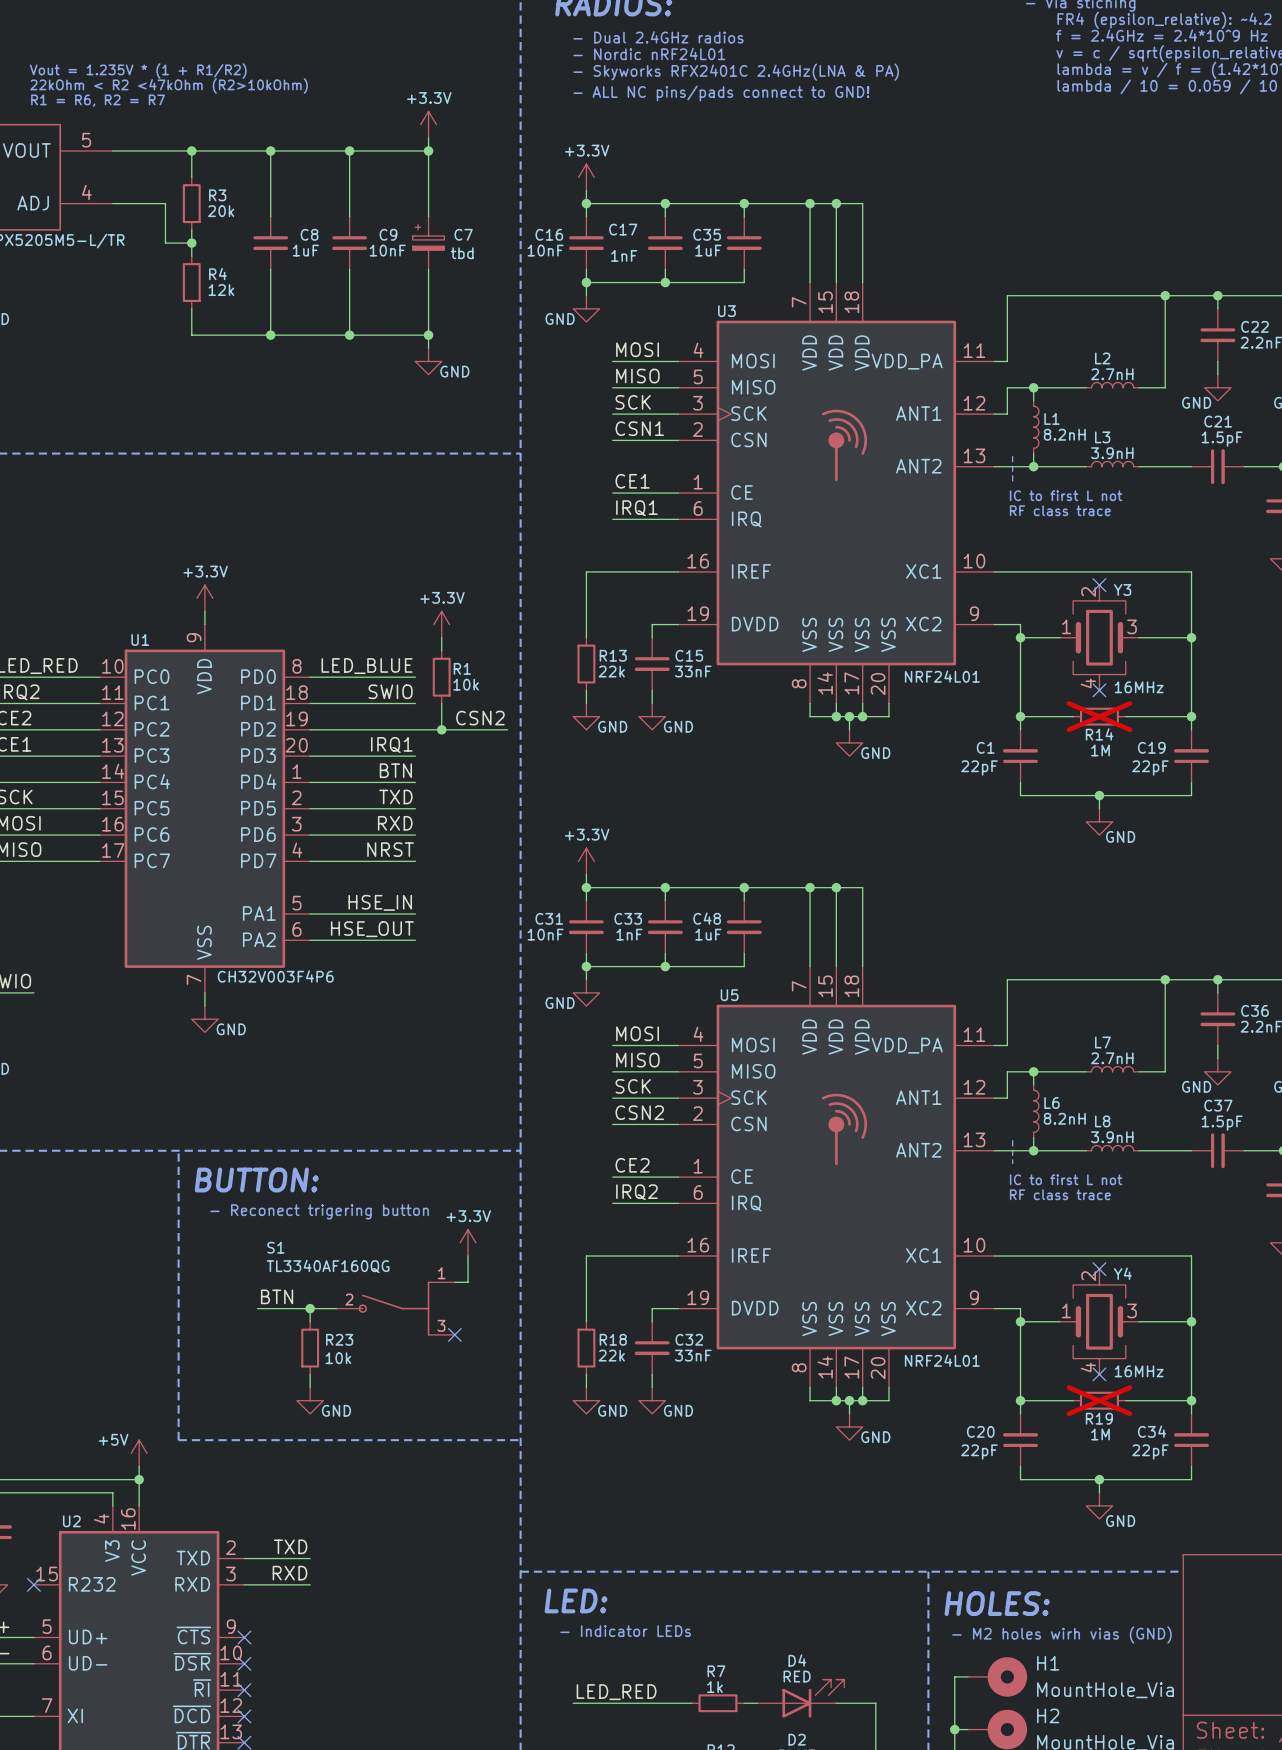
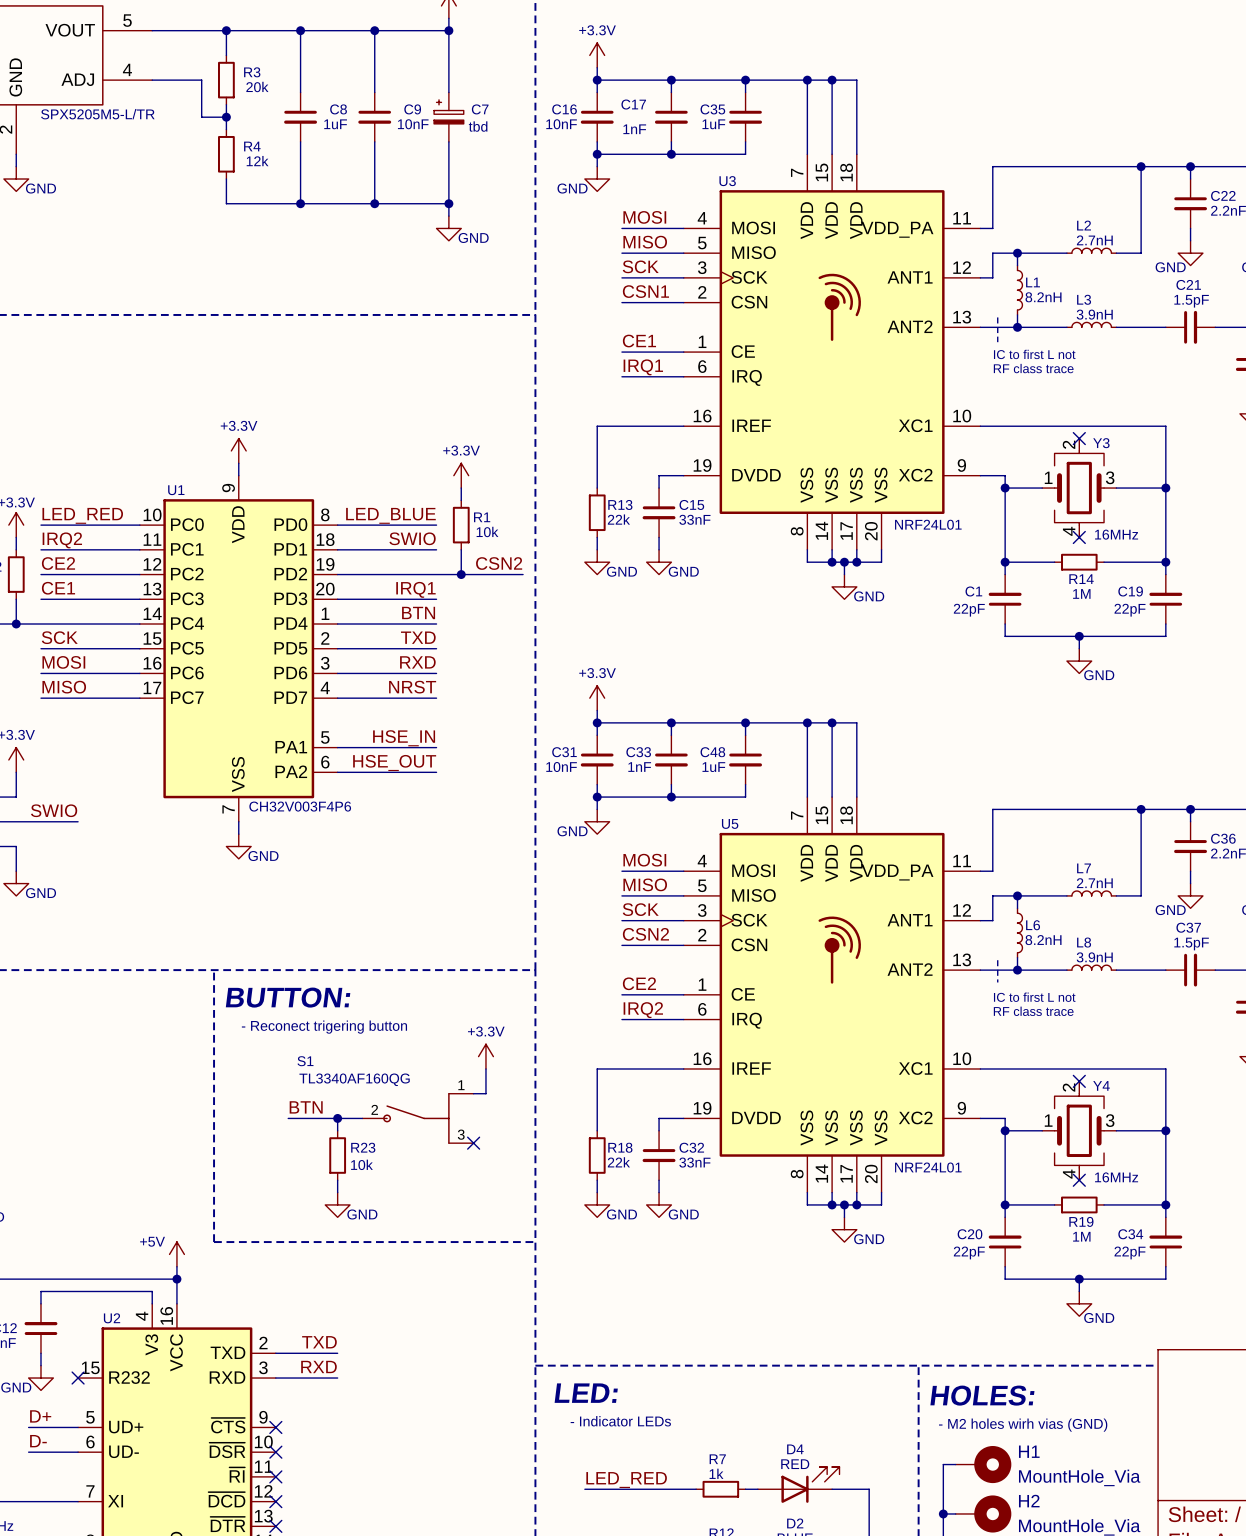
R14 do-not-place cross: (1099, 716) -> none
R19 do-not-place cross: (1099, 1400) -> none

